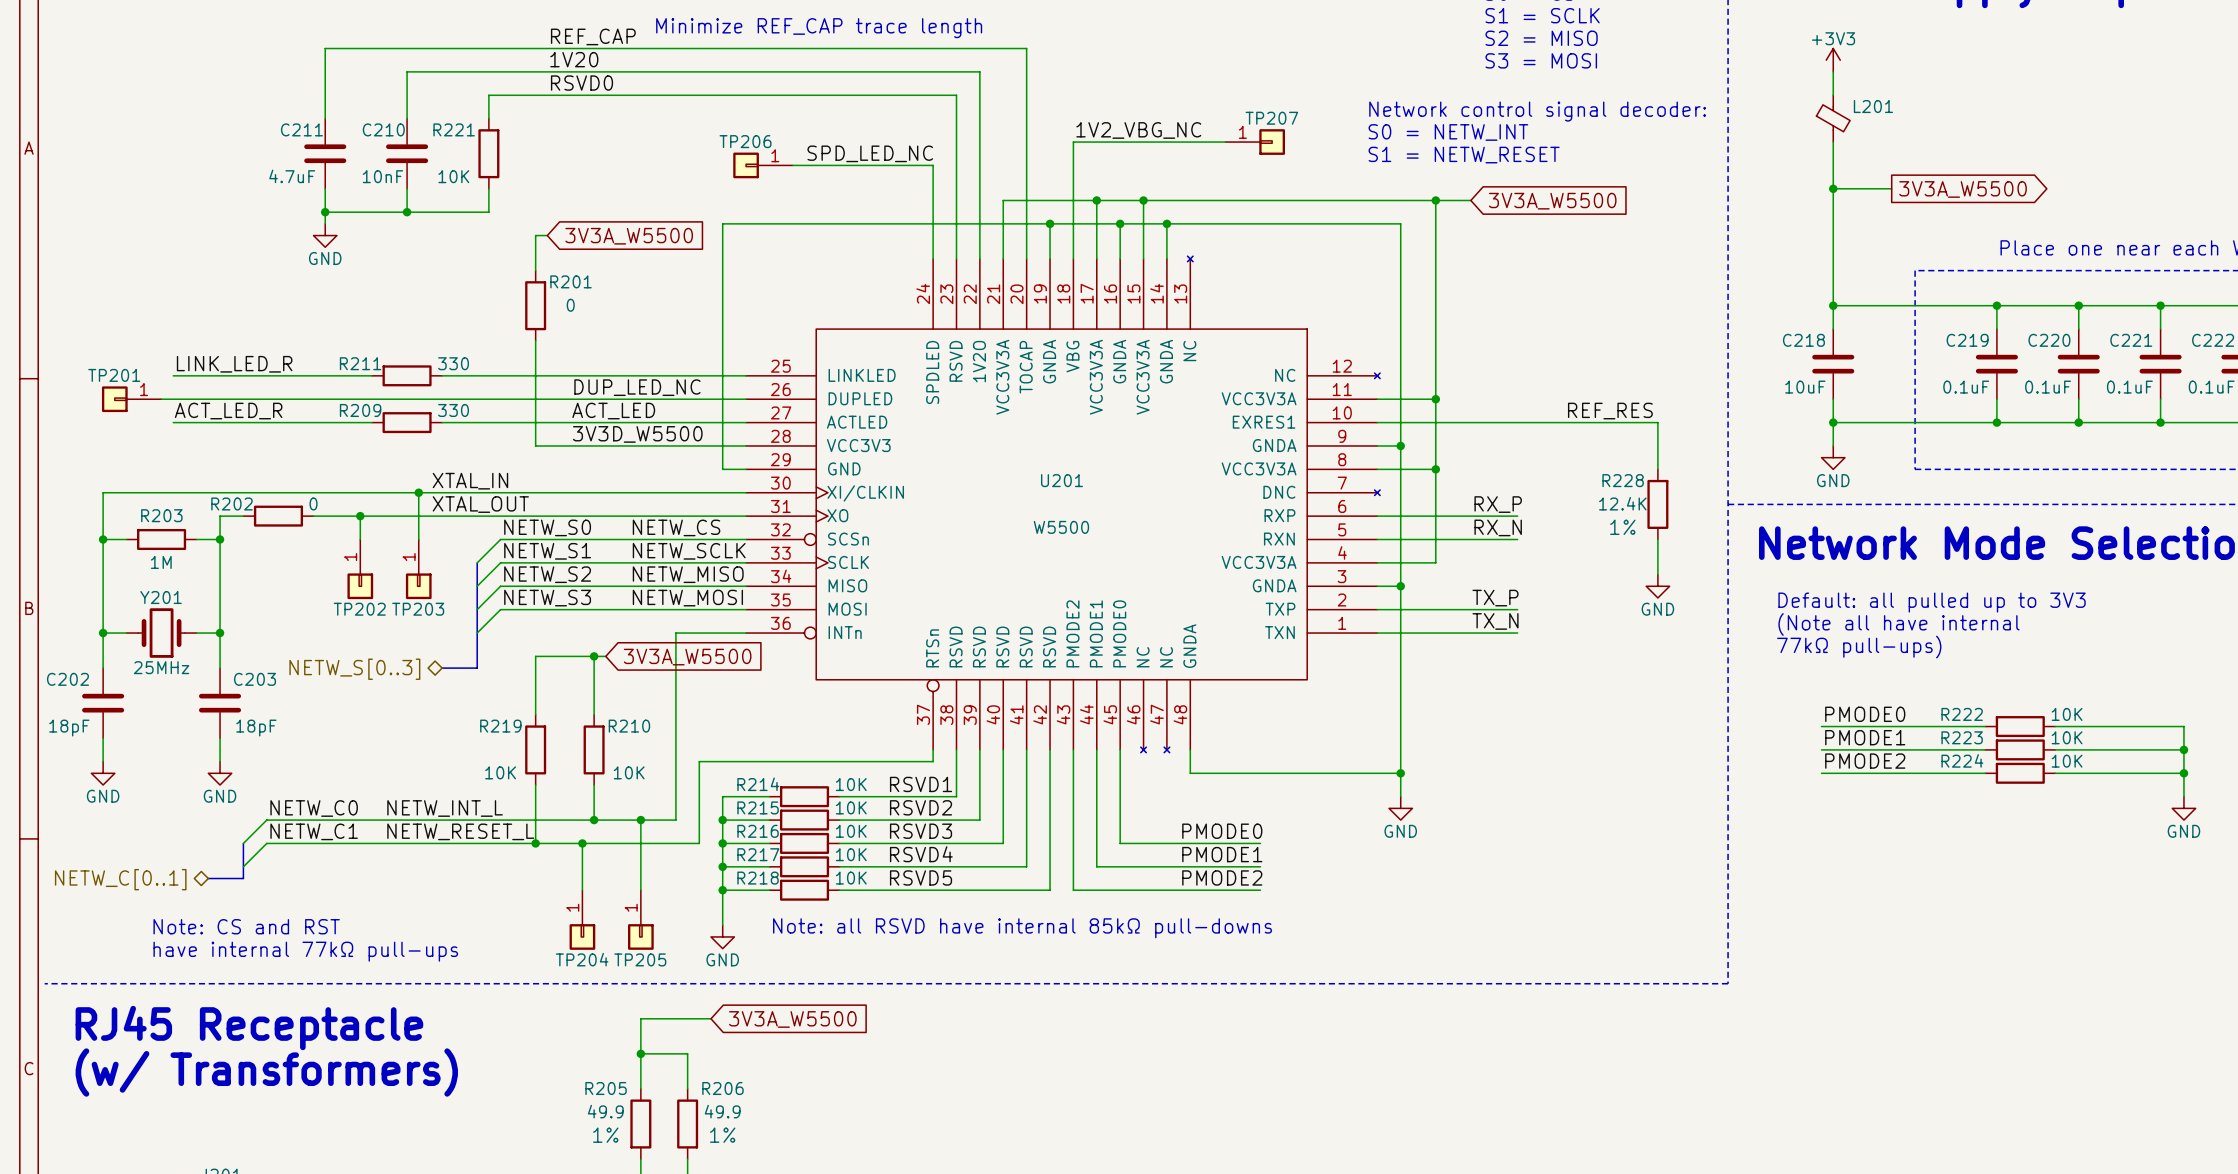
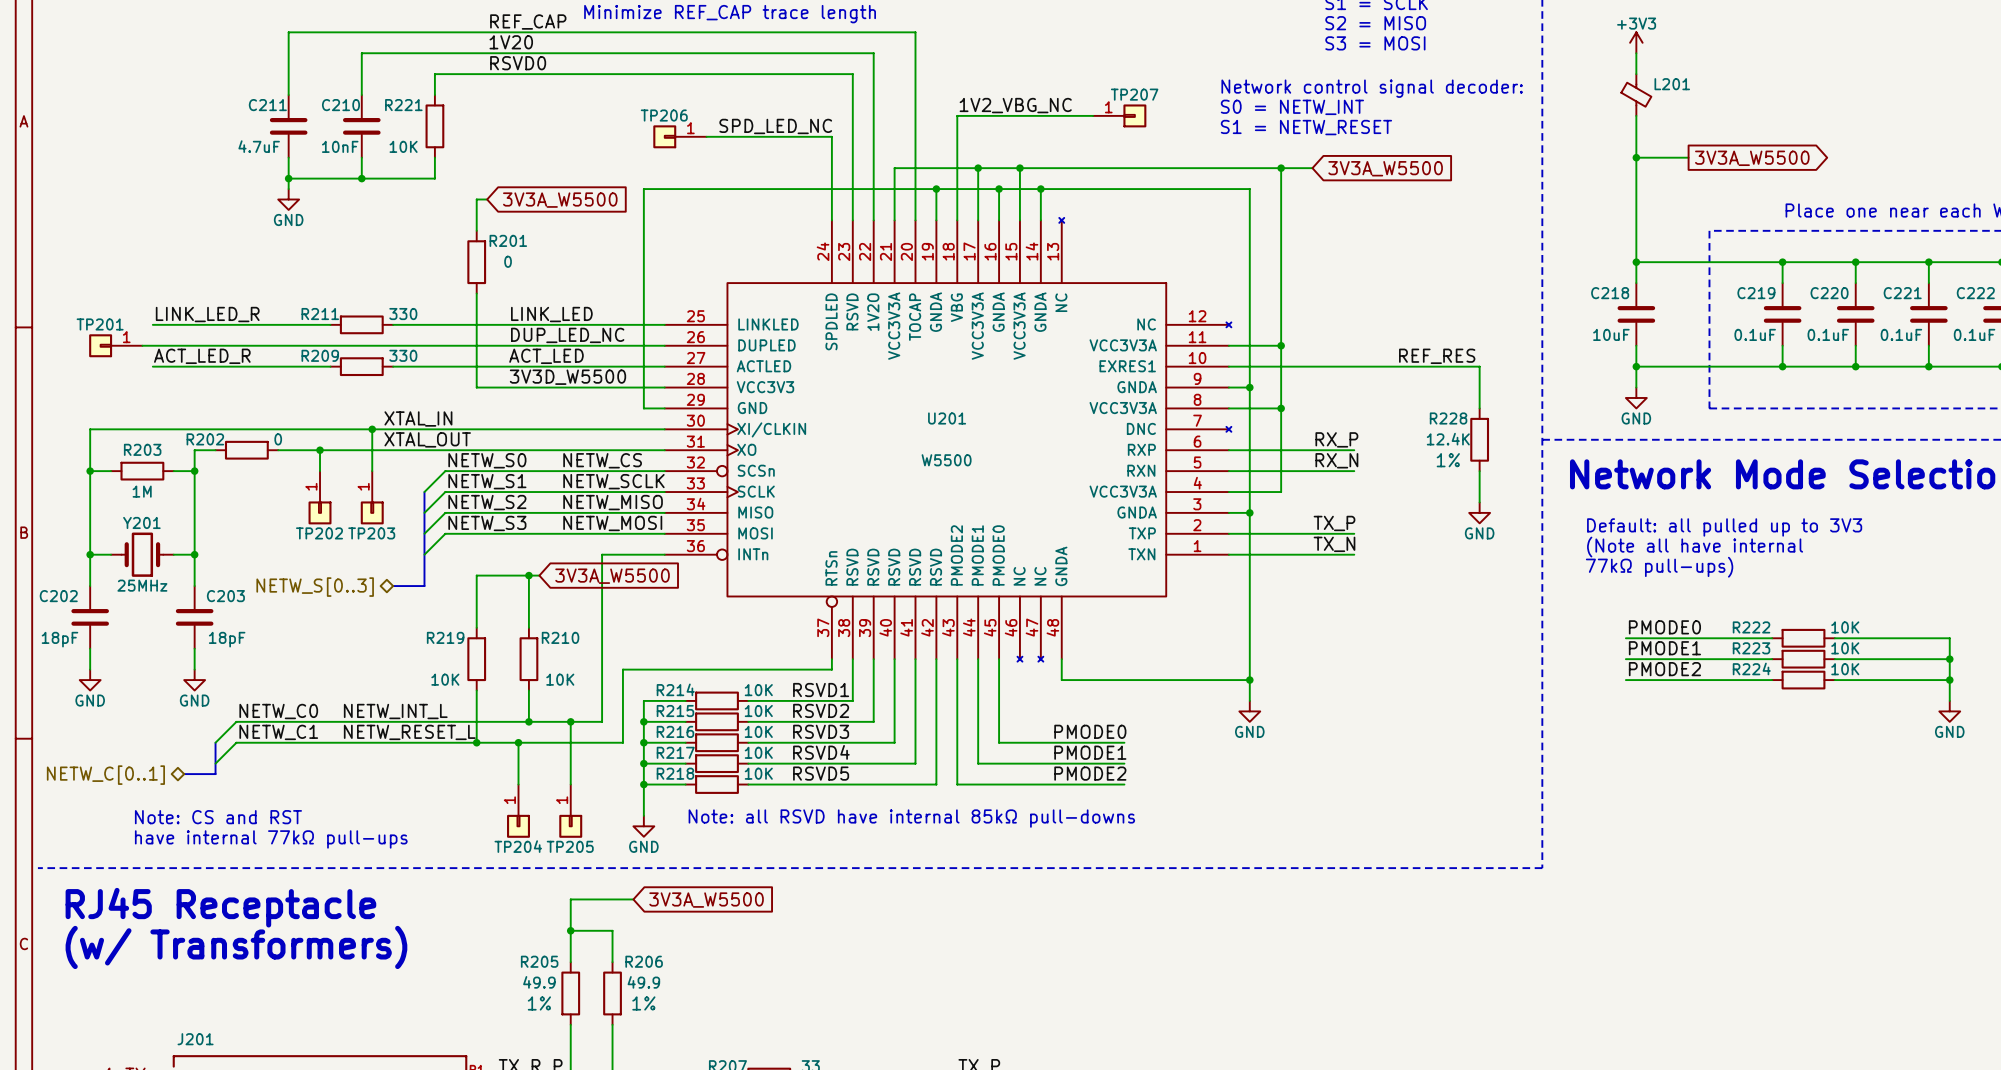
label: none -> LINK_LED (551, 314)

